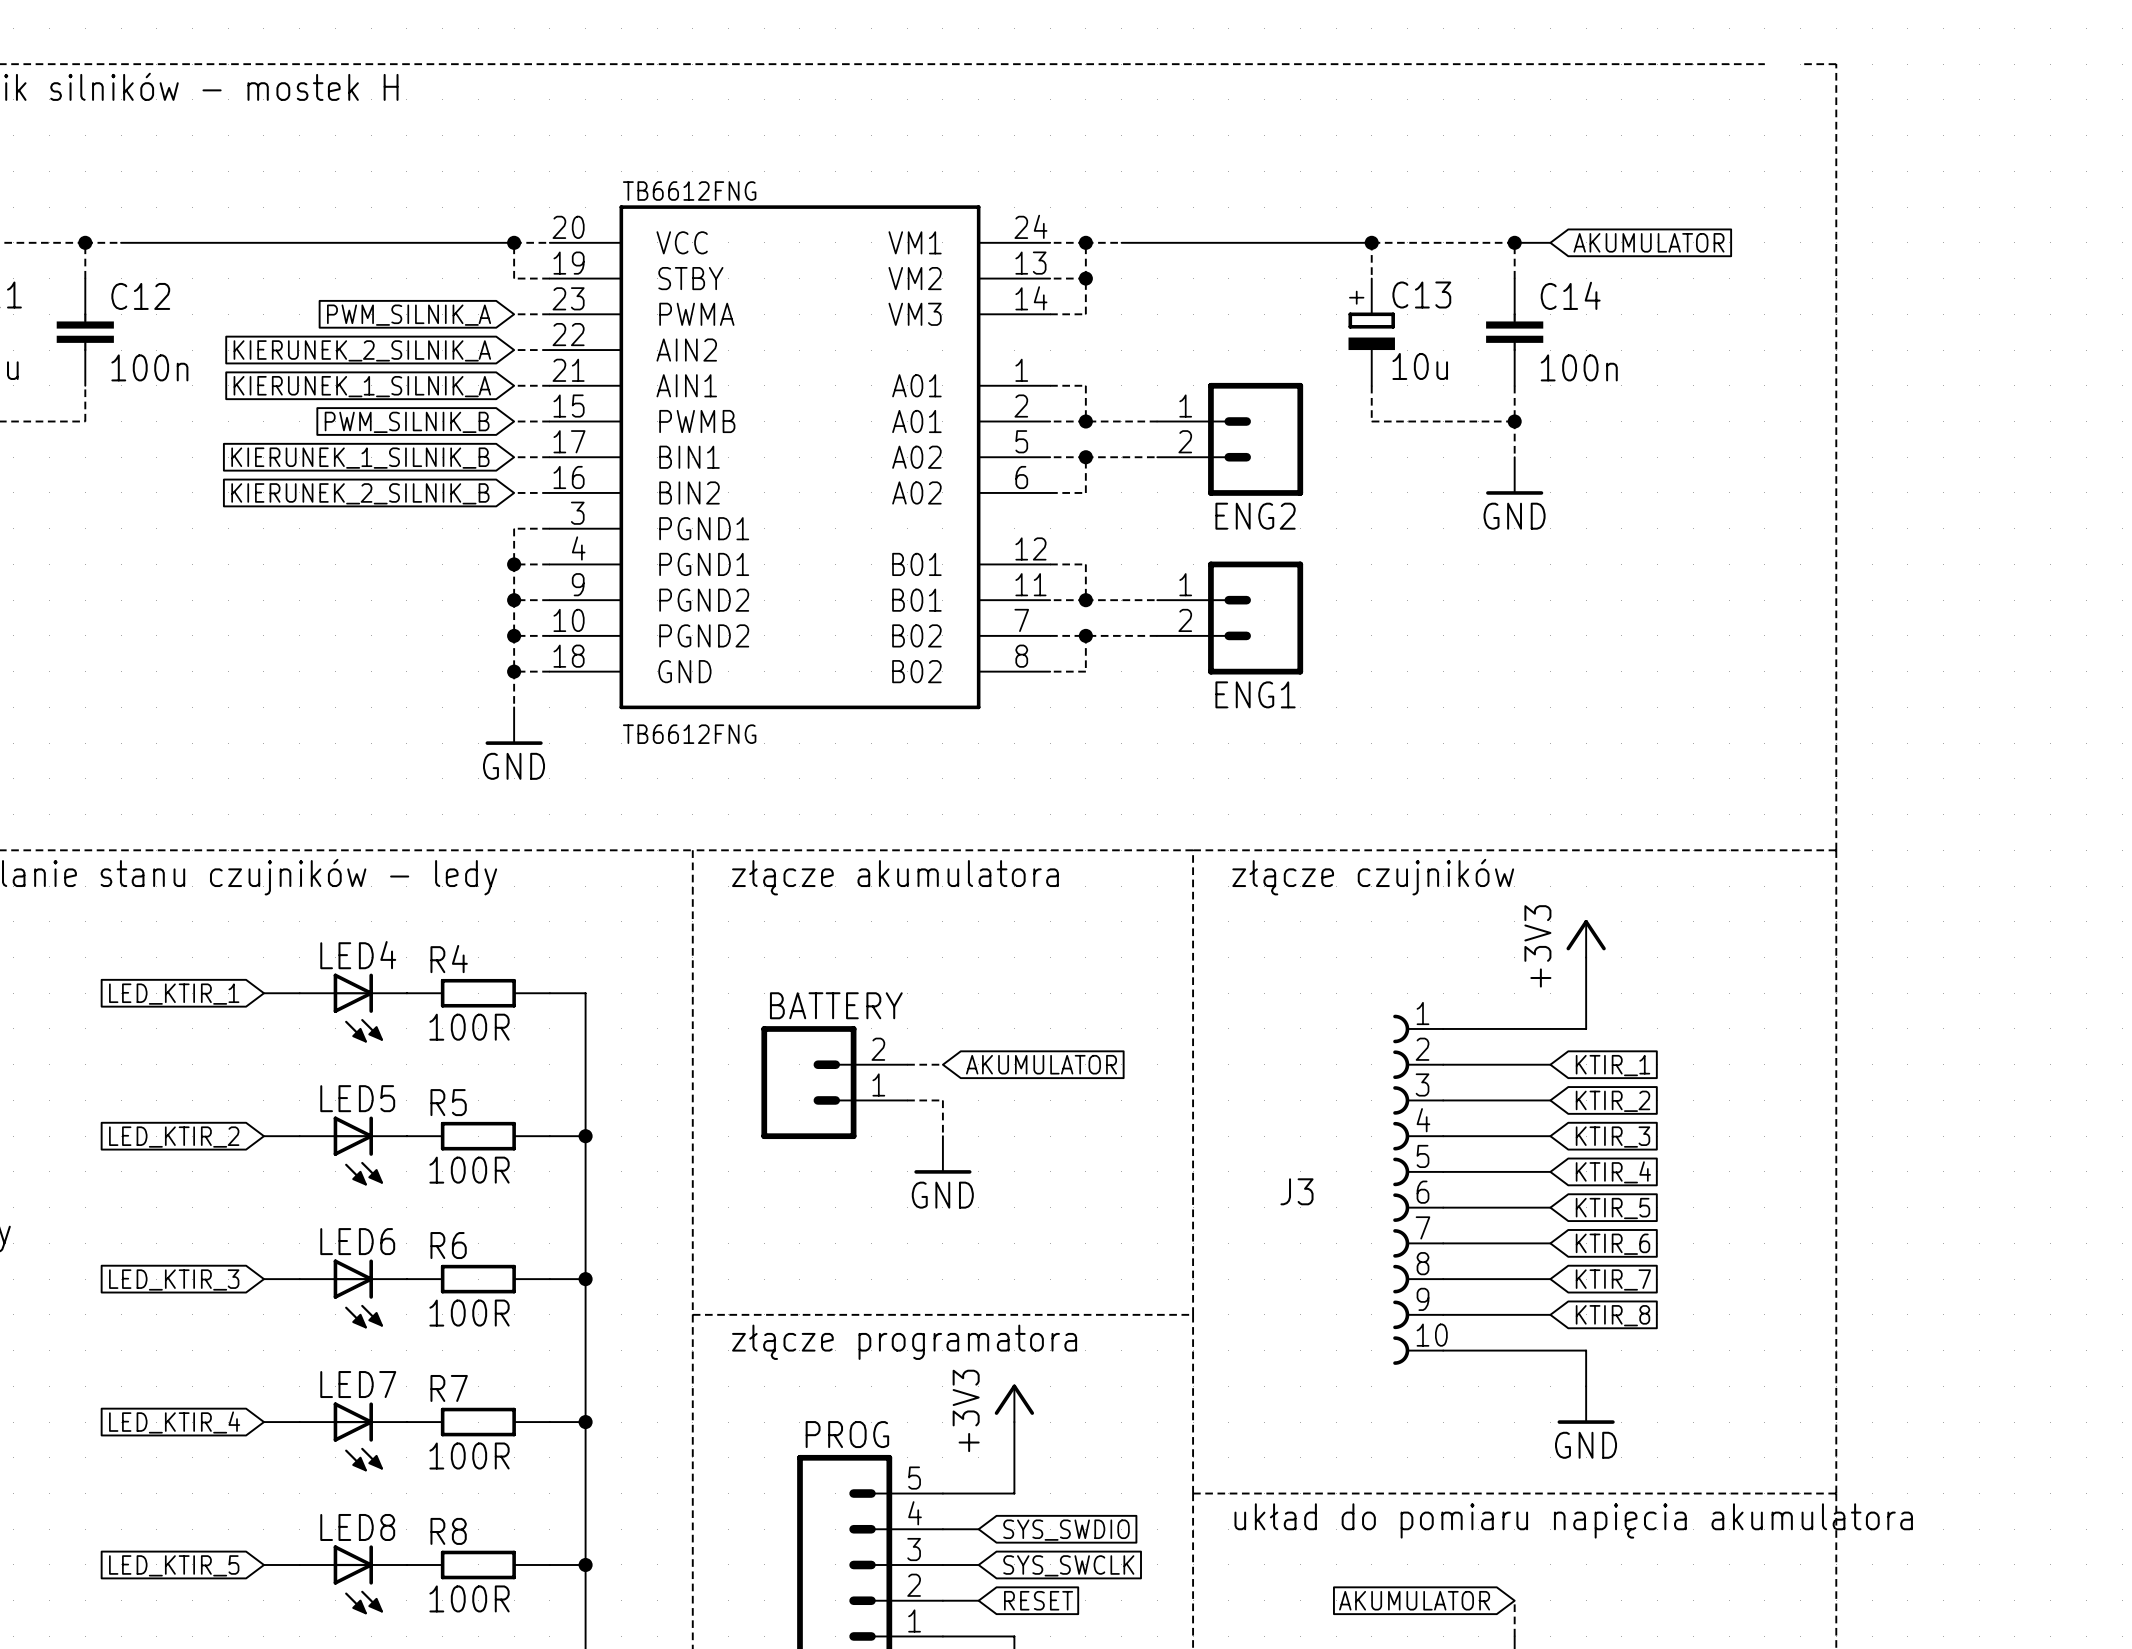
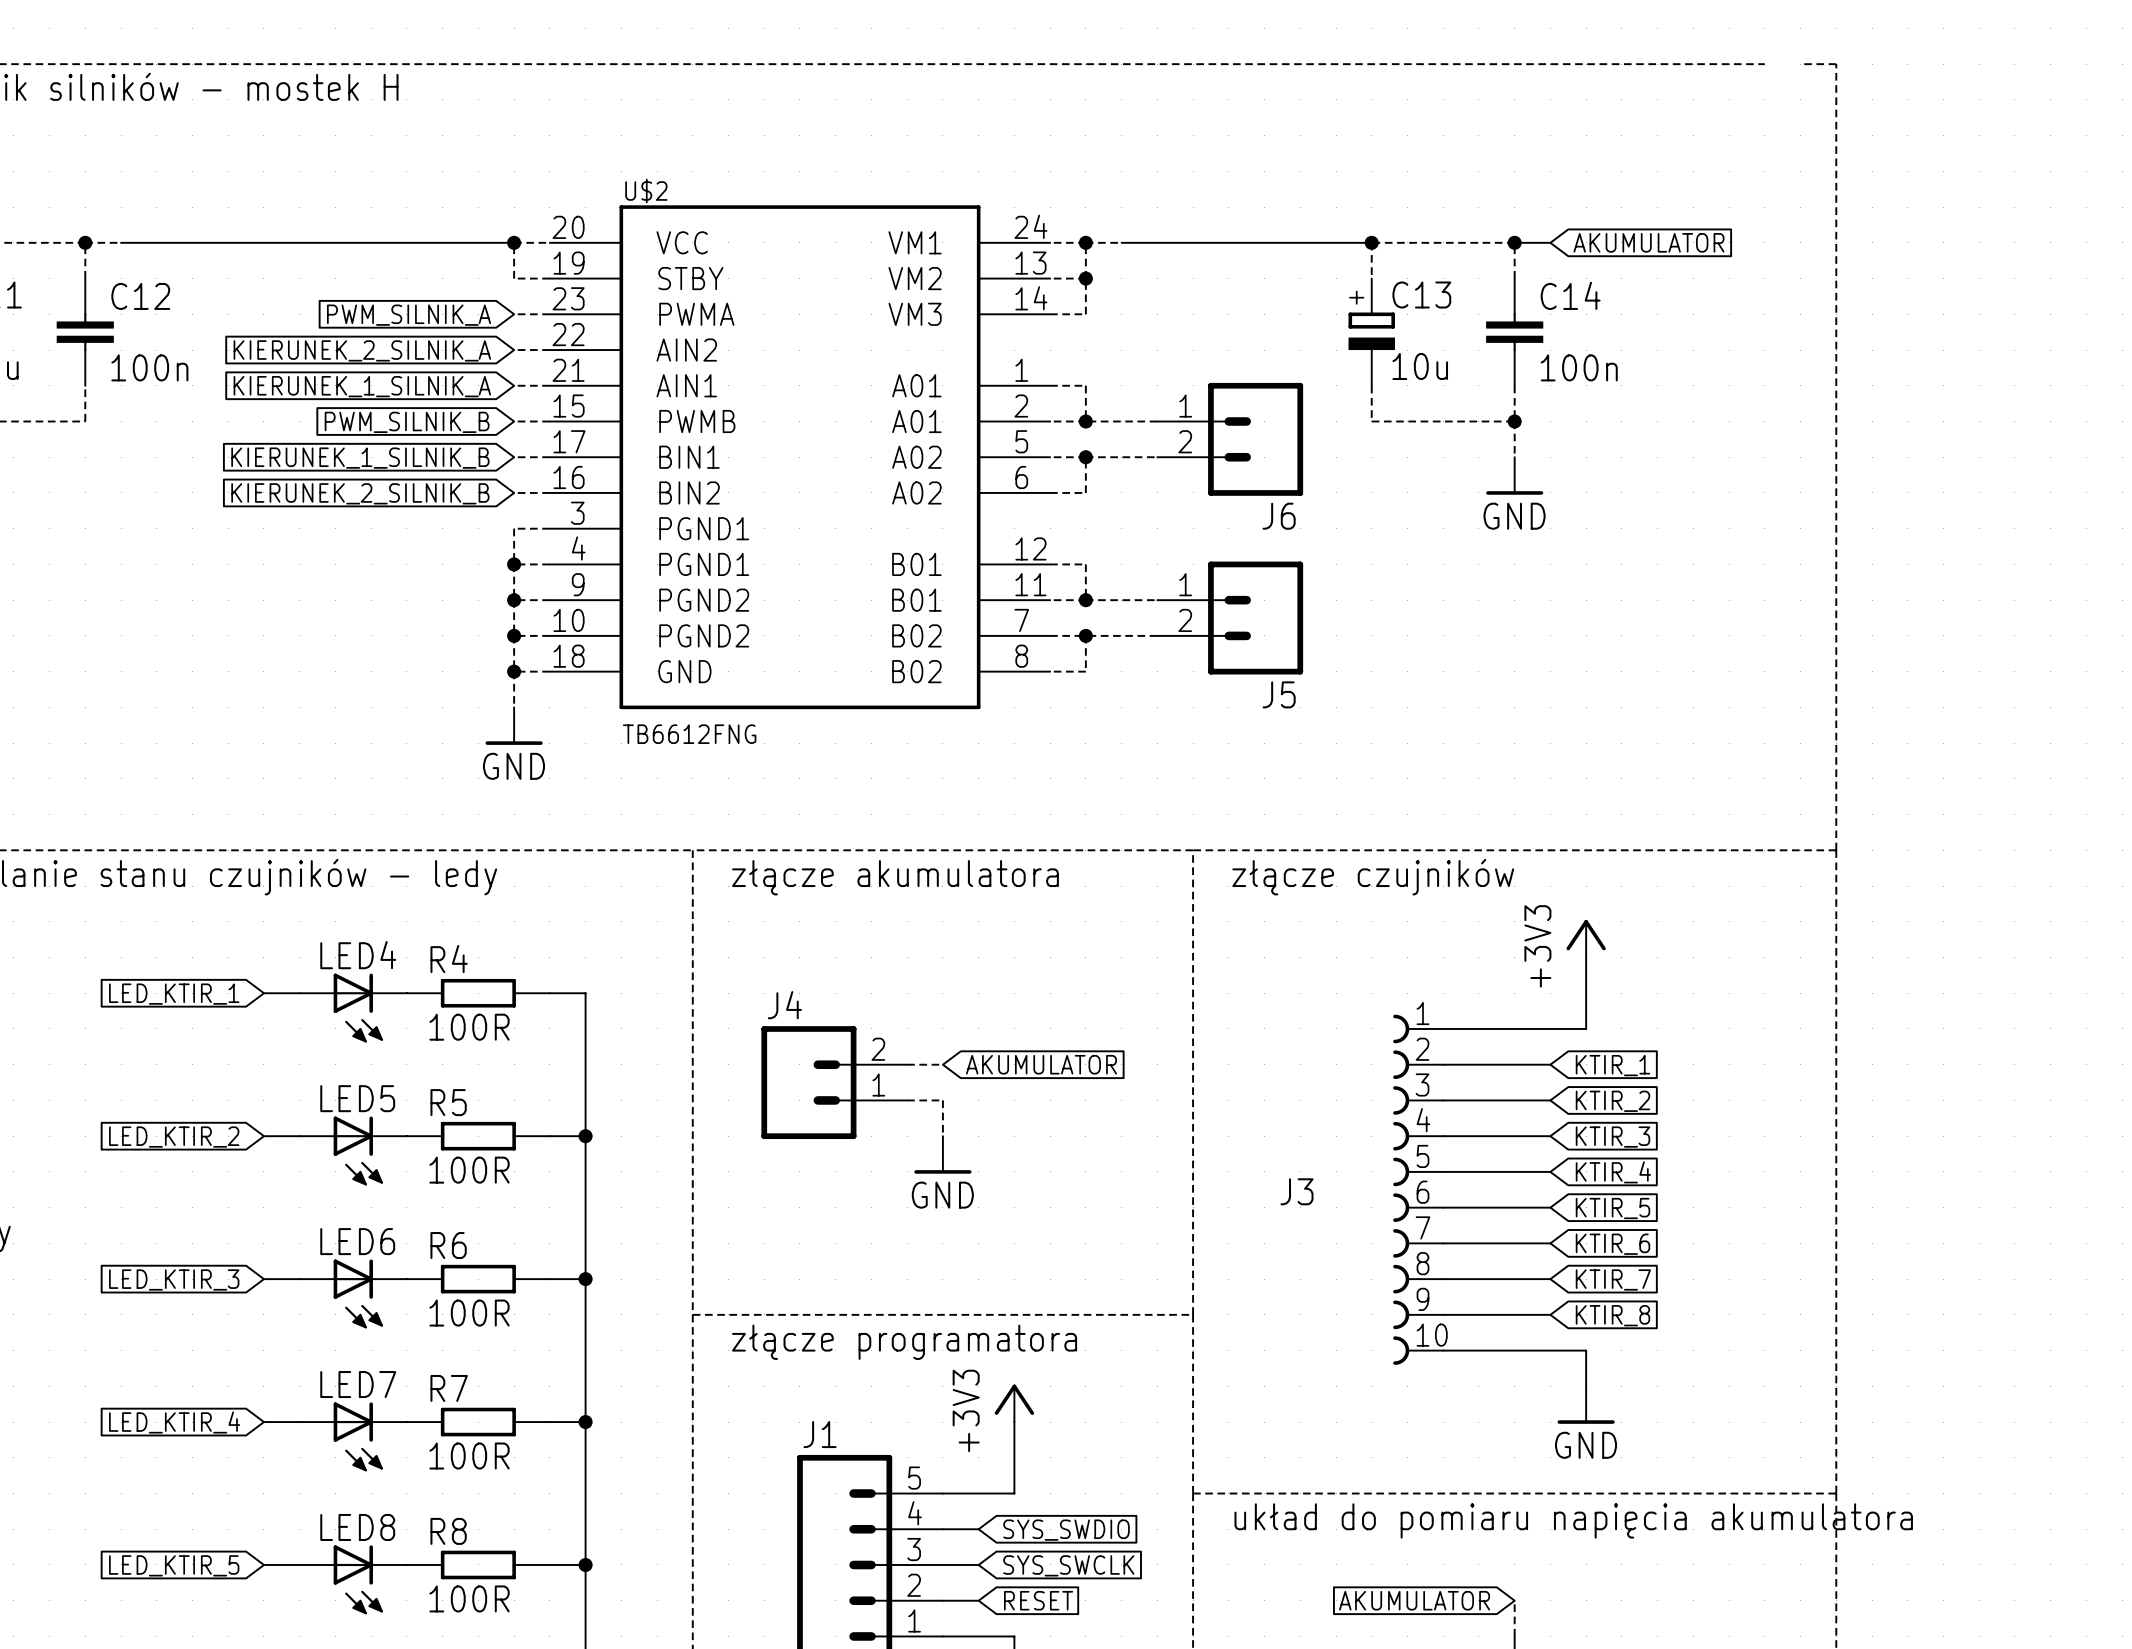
TB6612FNG name: TB6612FNG (689, 191) -> U$2 (646, 191)
ENG2 name: ENG2 (1255, 516) -> J6 (1279, 516)
ENG1 name: ENG1 (1255, 694) -> J5 (1279, 694)
BATTERY name: BATTERY (836, 1005) -> J4 (784, 1005)
PROG name: PROG (847, 1434) -> J1 (820, 1434)

